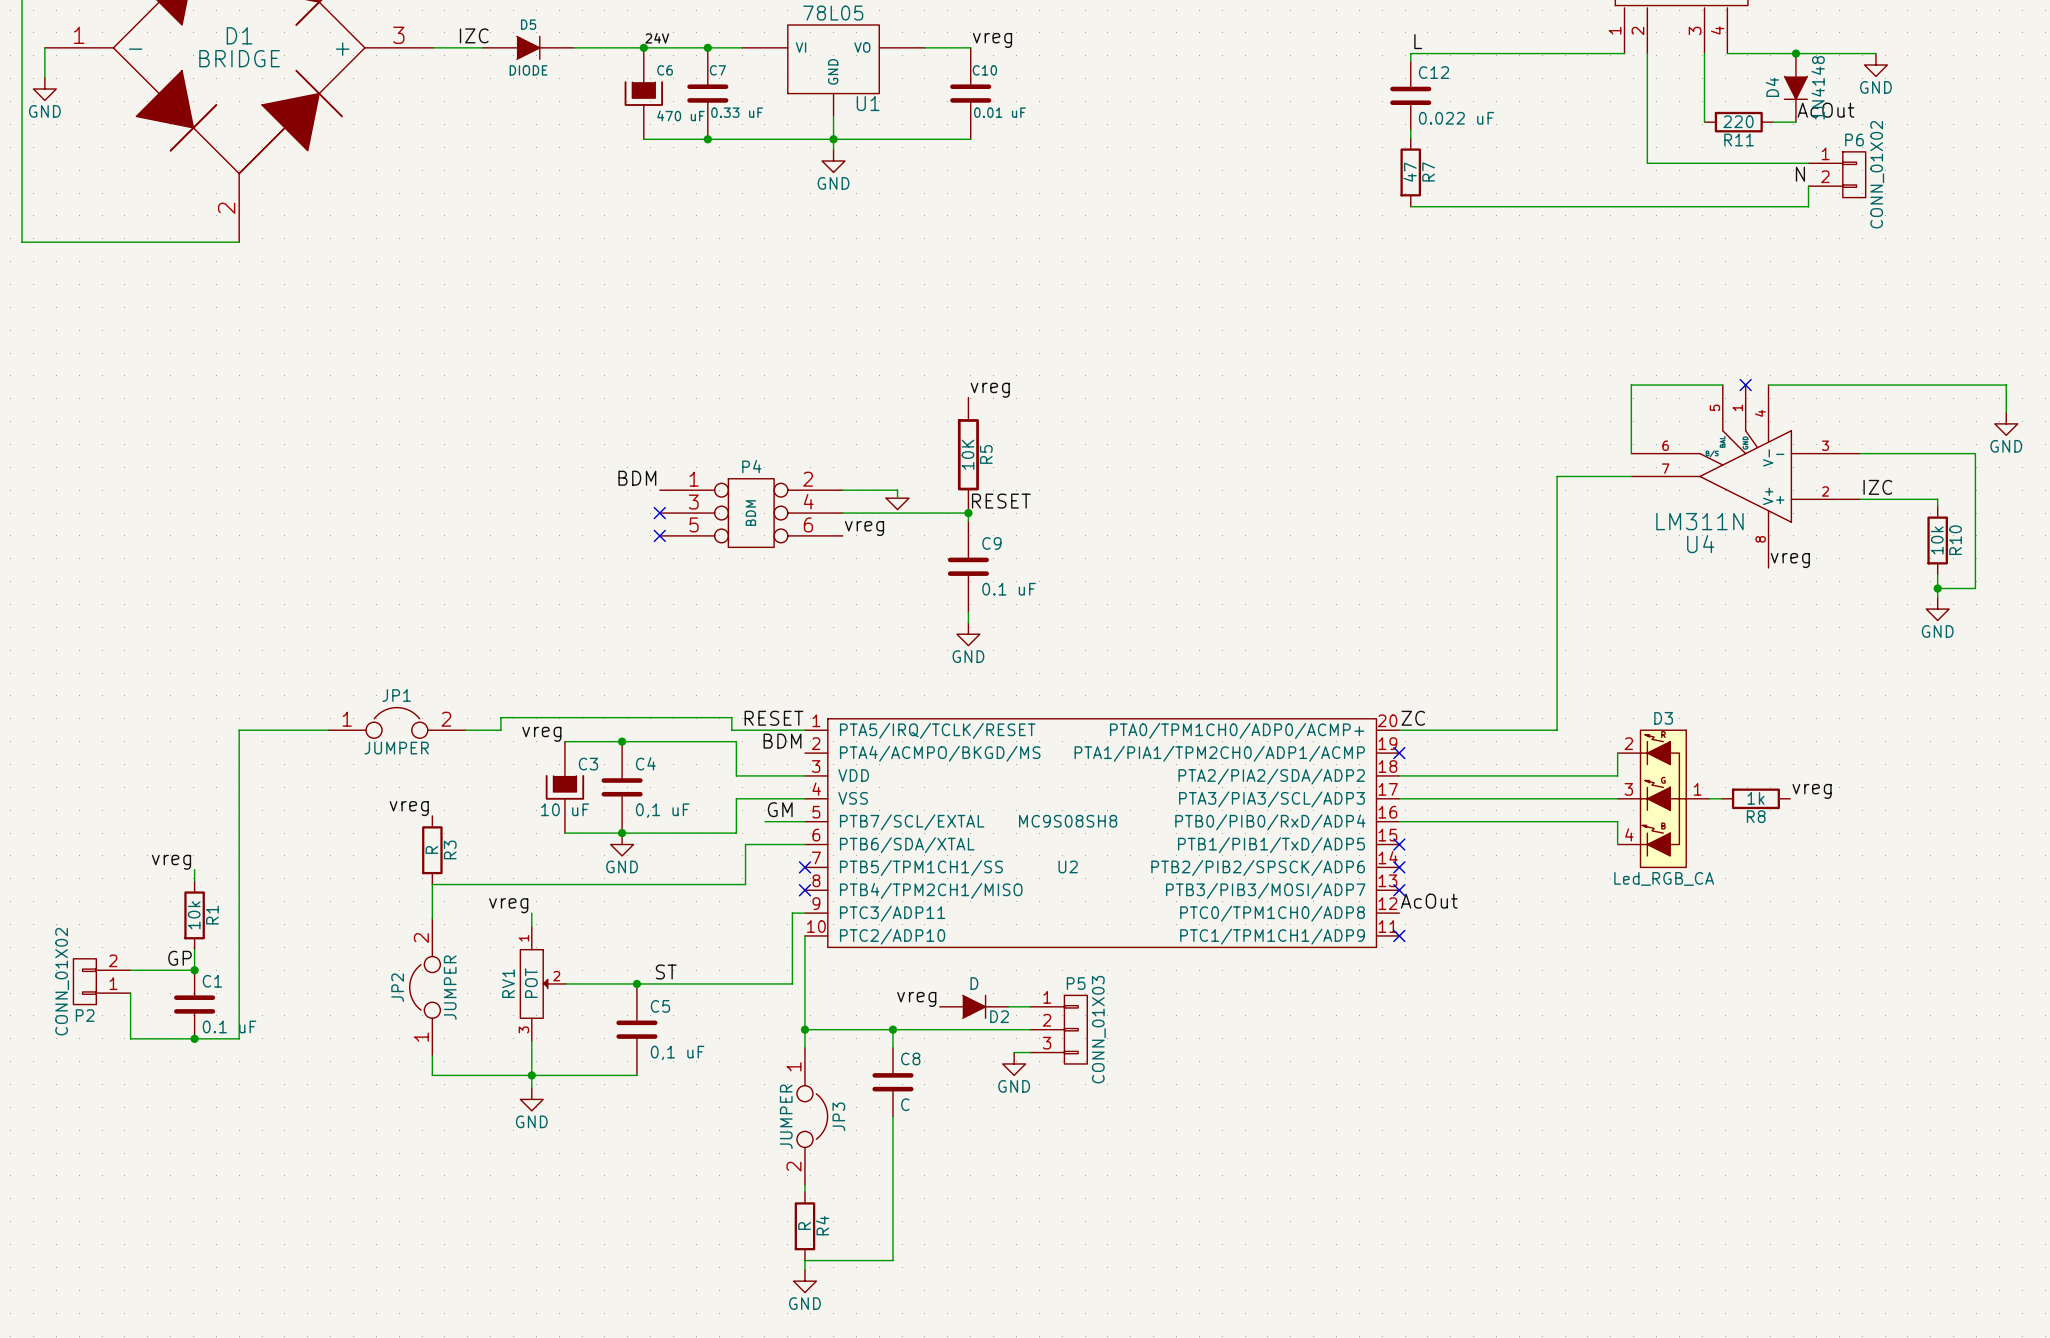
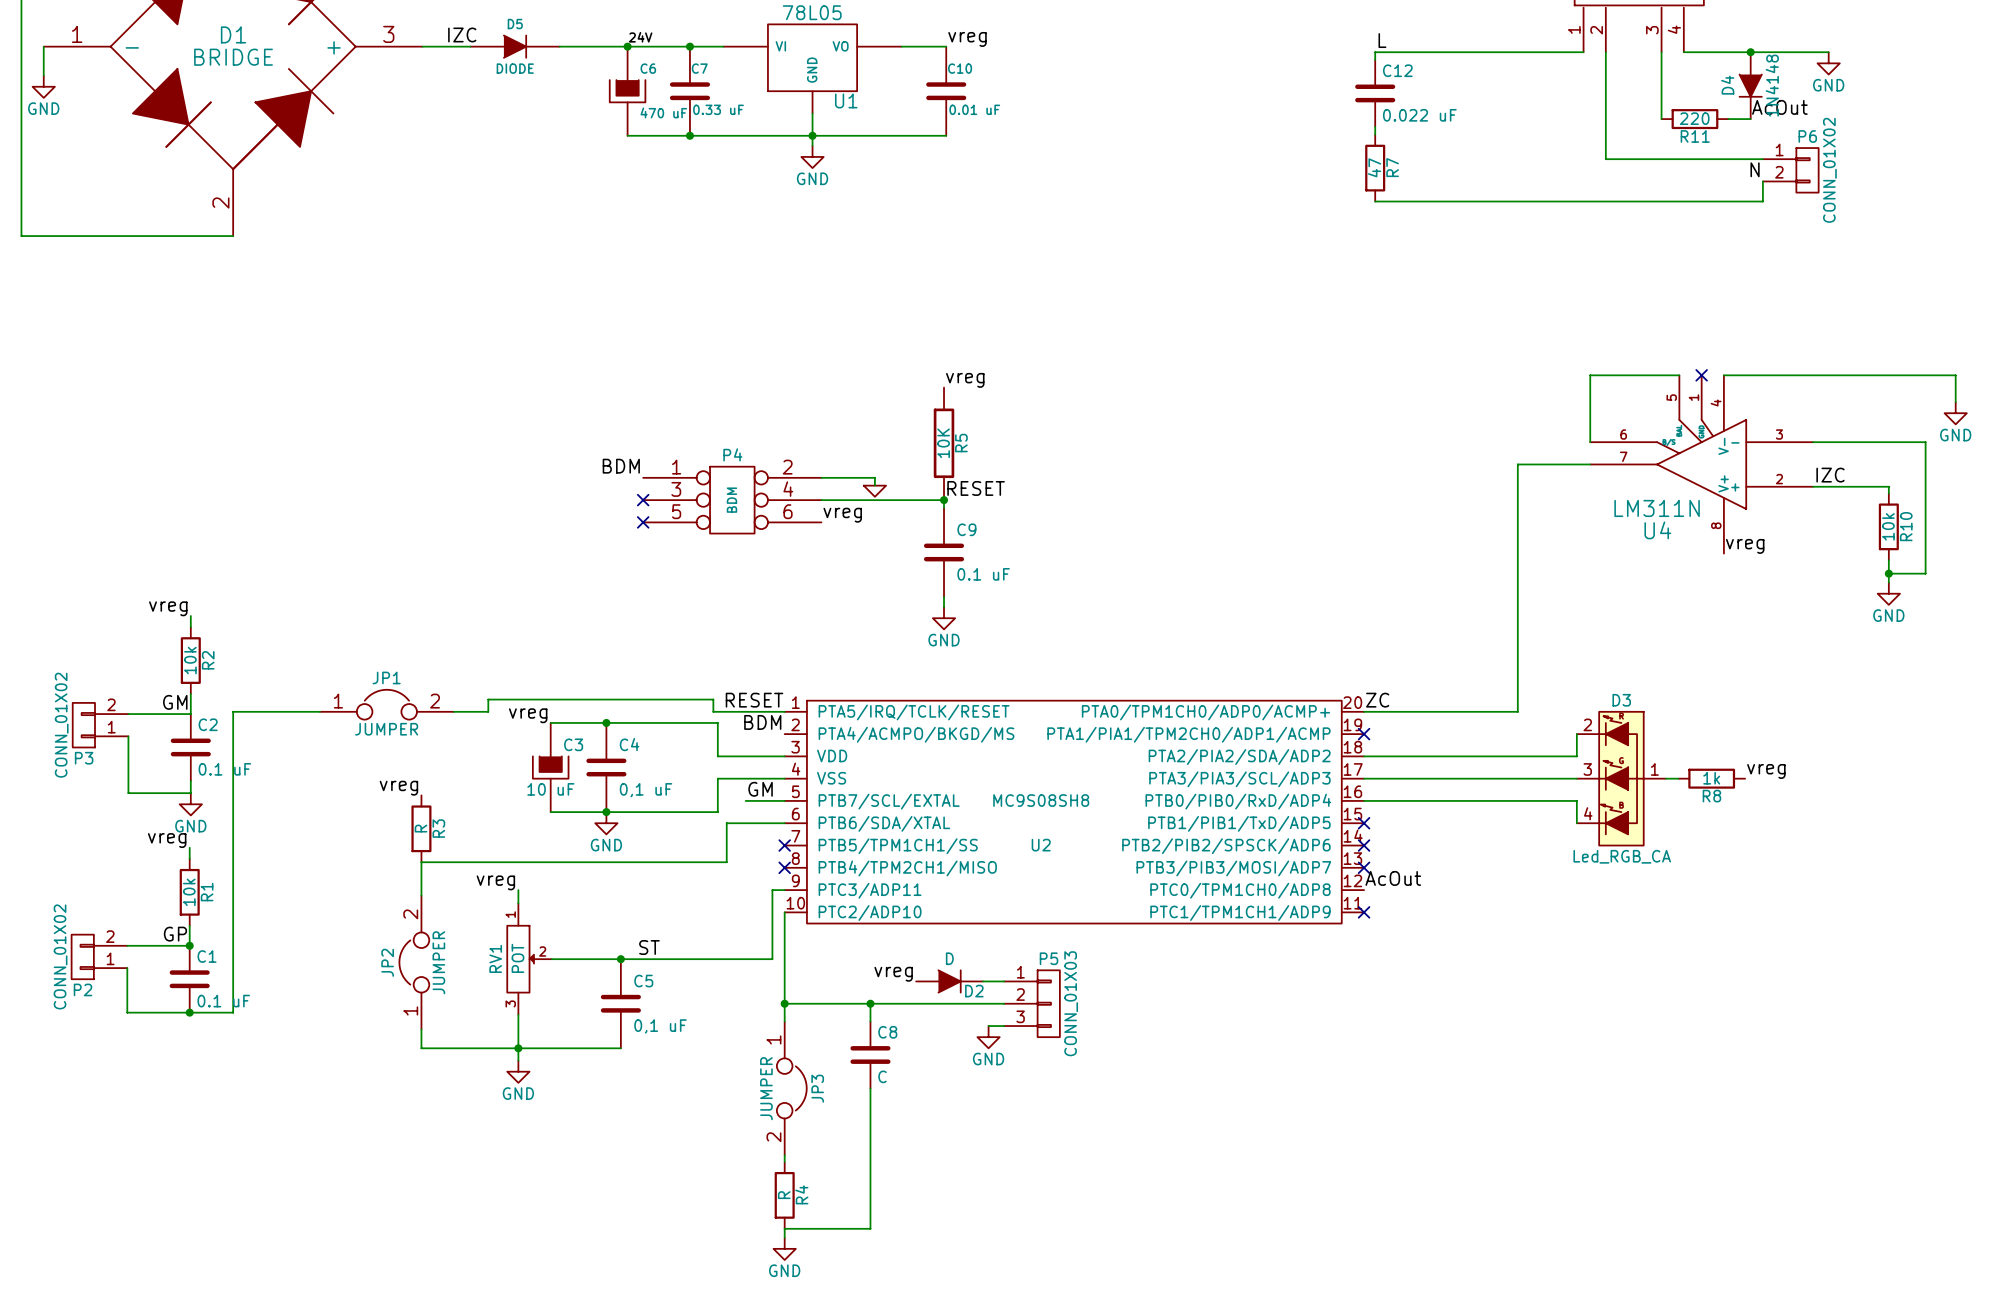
label: none -> vreg (168, 608)
wire: none -> (190, 616) (190, 627)
R2: none -> 10k (190, 660)
wire: none -> (190, 693) (190, 714) (128, 714)
label: none -> GM (175, 702)
P3: none -> CONN_01X02 (100, 725)
wire: none -> (128, 736) (128, 793) (190, 793) (190, 780)
C2: none -> 0.1 uF (190, 747)
power symbol: none -> GND (190, 804)

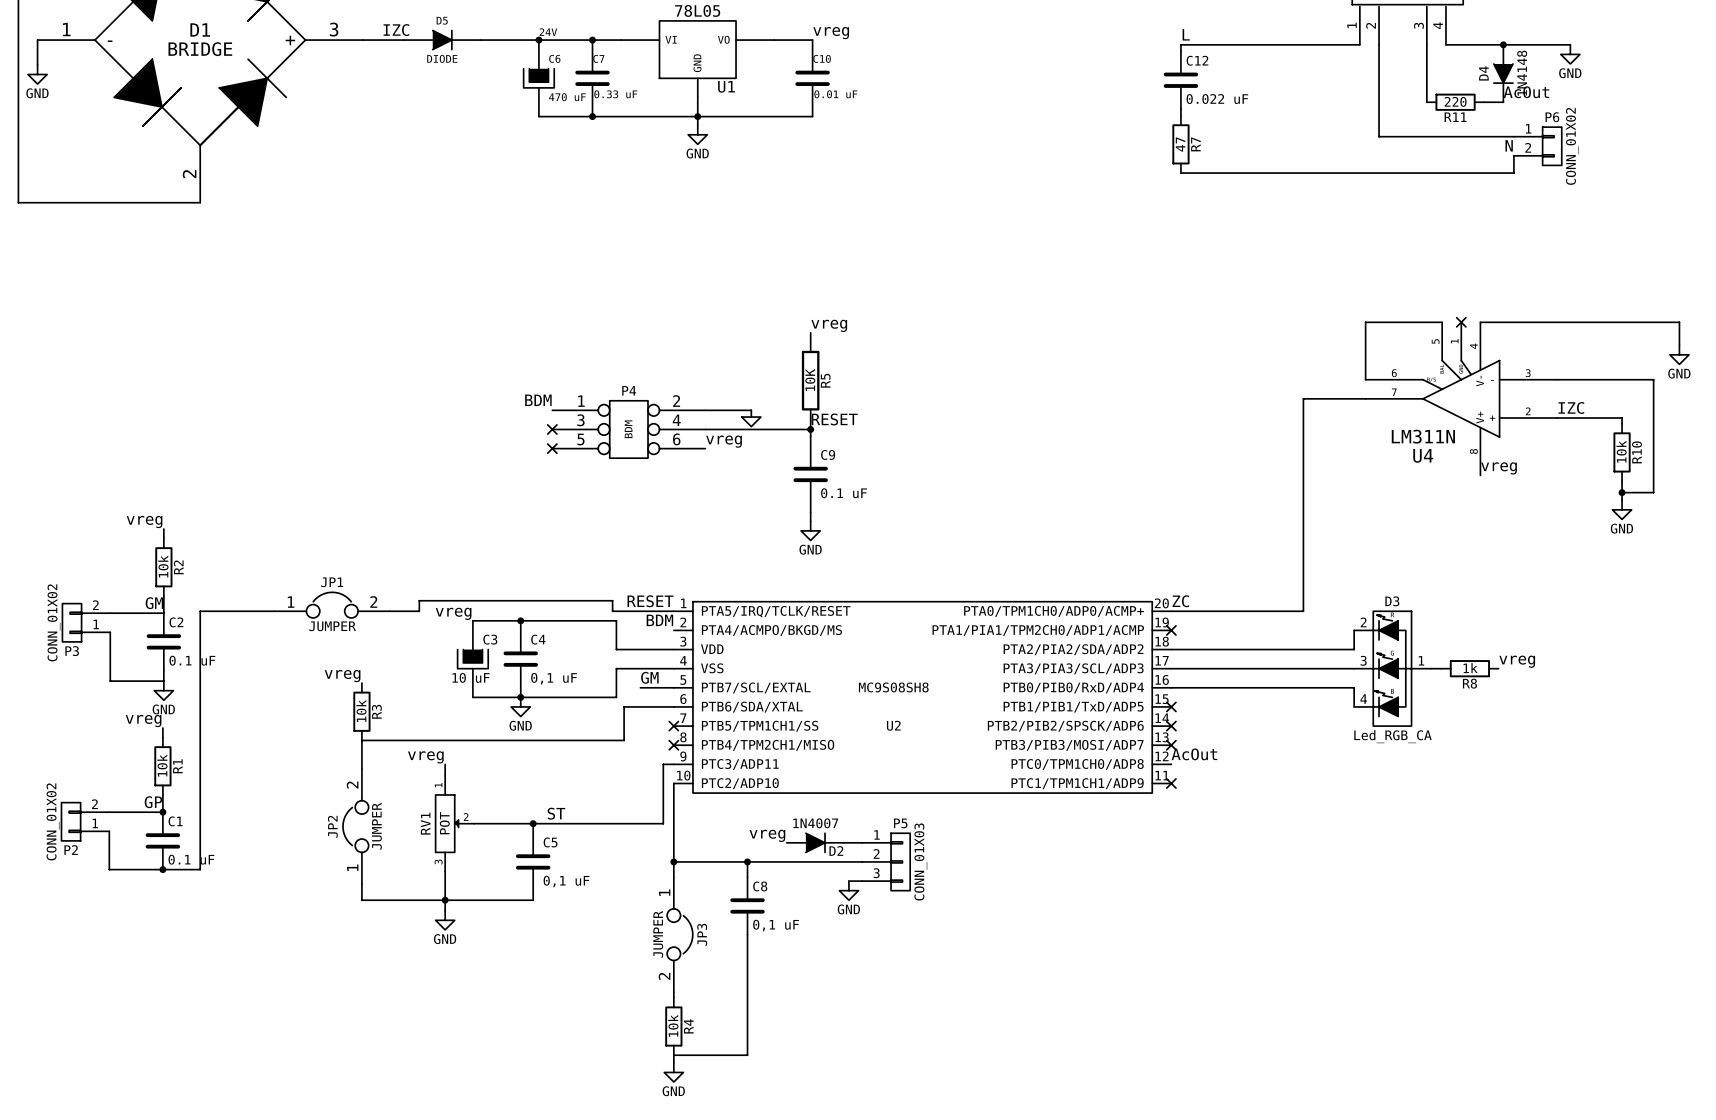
R3 value: R (421, 828) -> 10k (361, 711)
D2 value: D (949, 958) -> 1N4007 (815, 823)
C8 value: C (882, 1076) -> 0,1 uF (776, 925)
R4 value: R (784, 1195) -> 10k (673, 1025)

